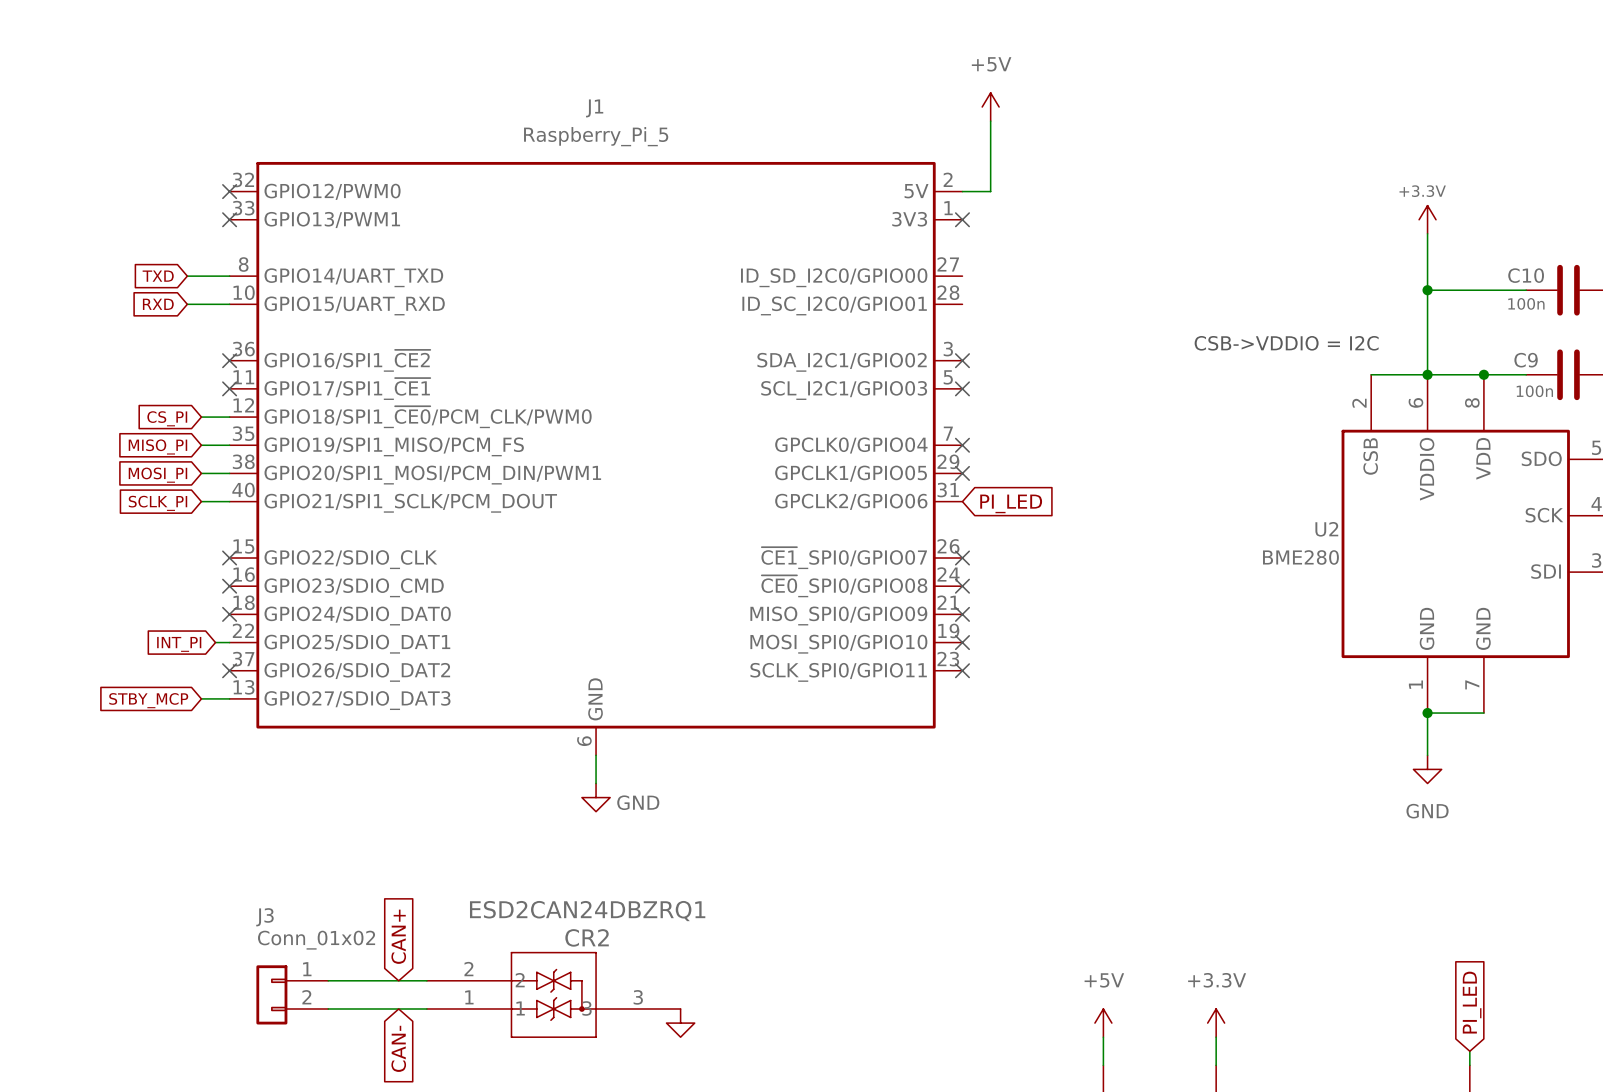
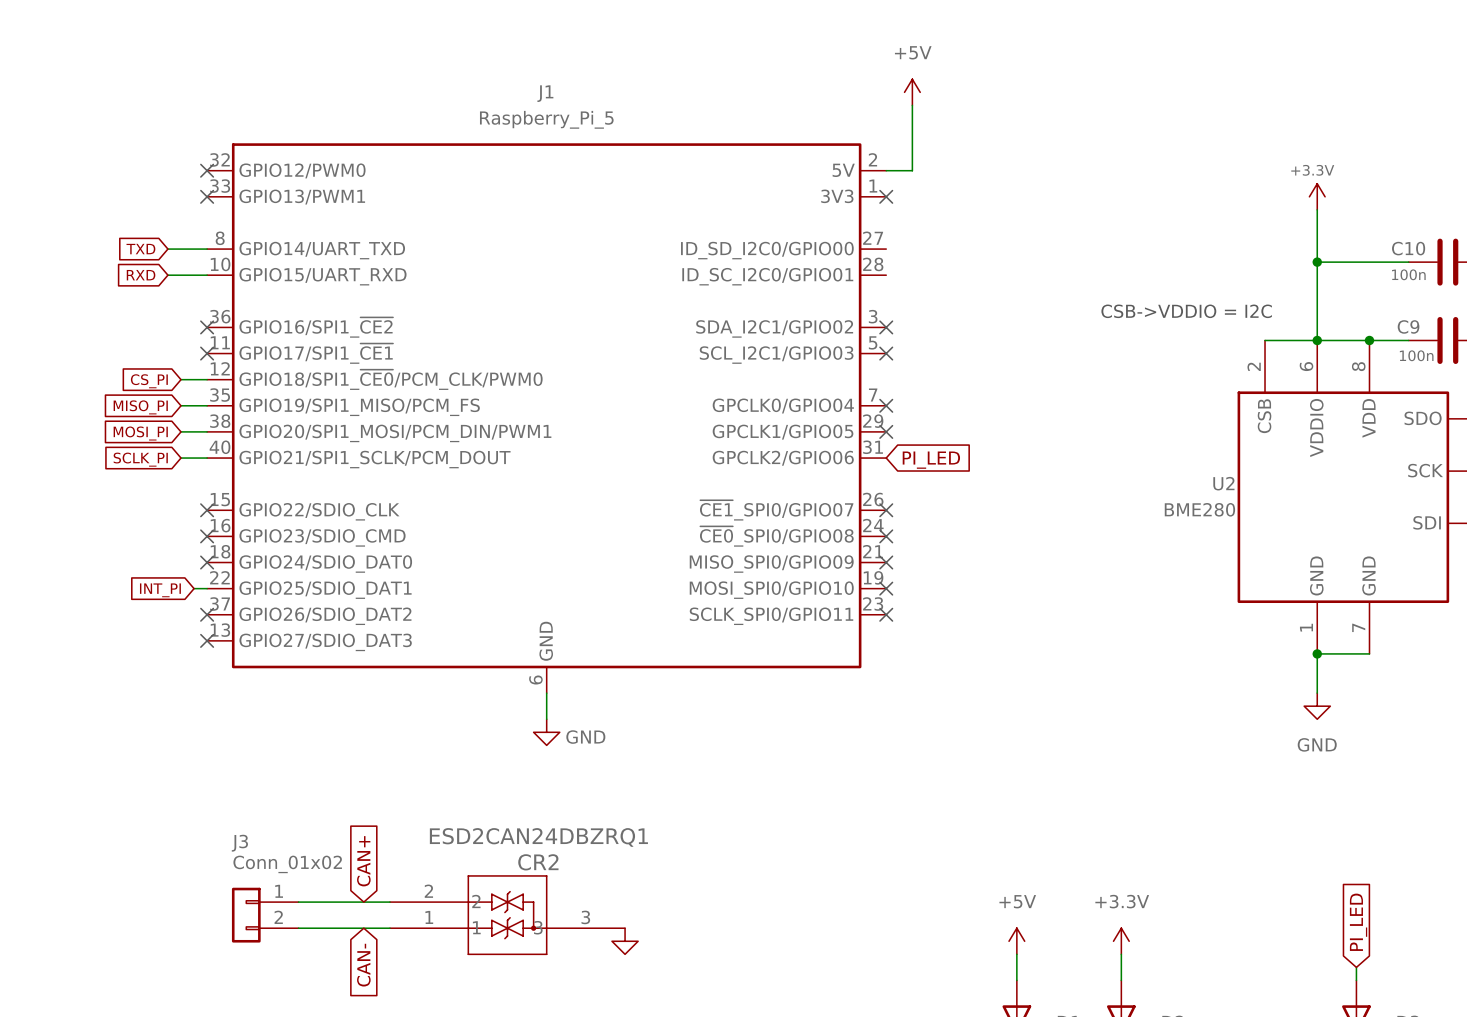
wire: (201, 698) (229, 698) -> none
no-connect mark: none -> (207, 640)
global label: STBY_MCP (148, 700) -> none

